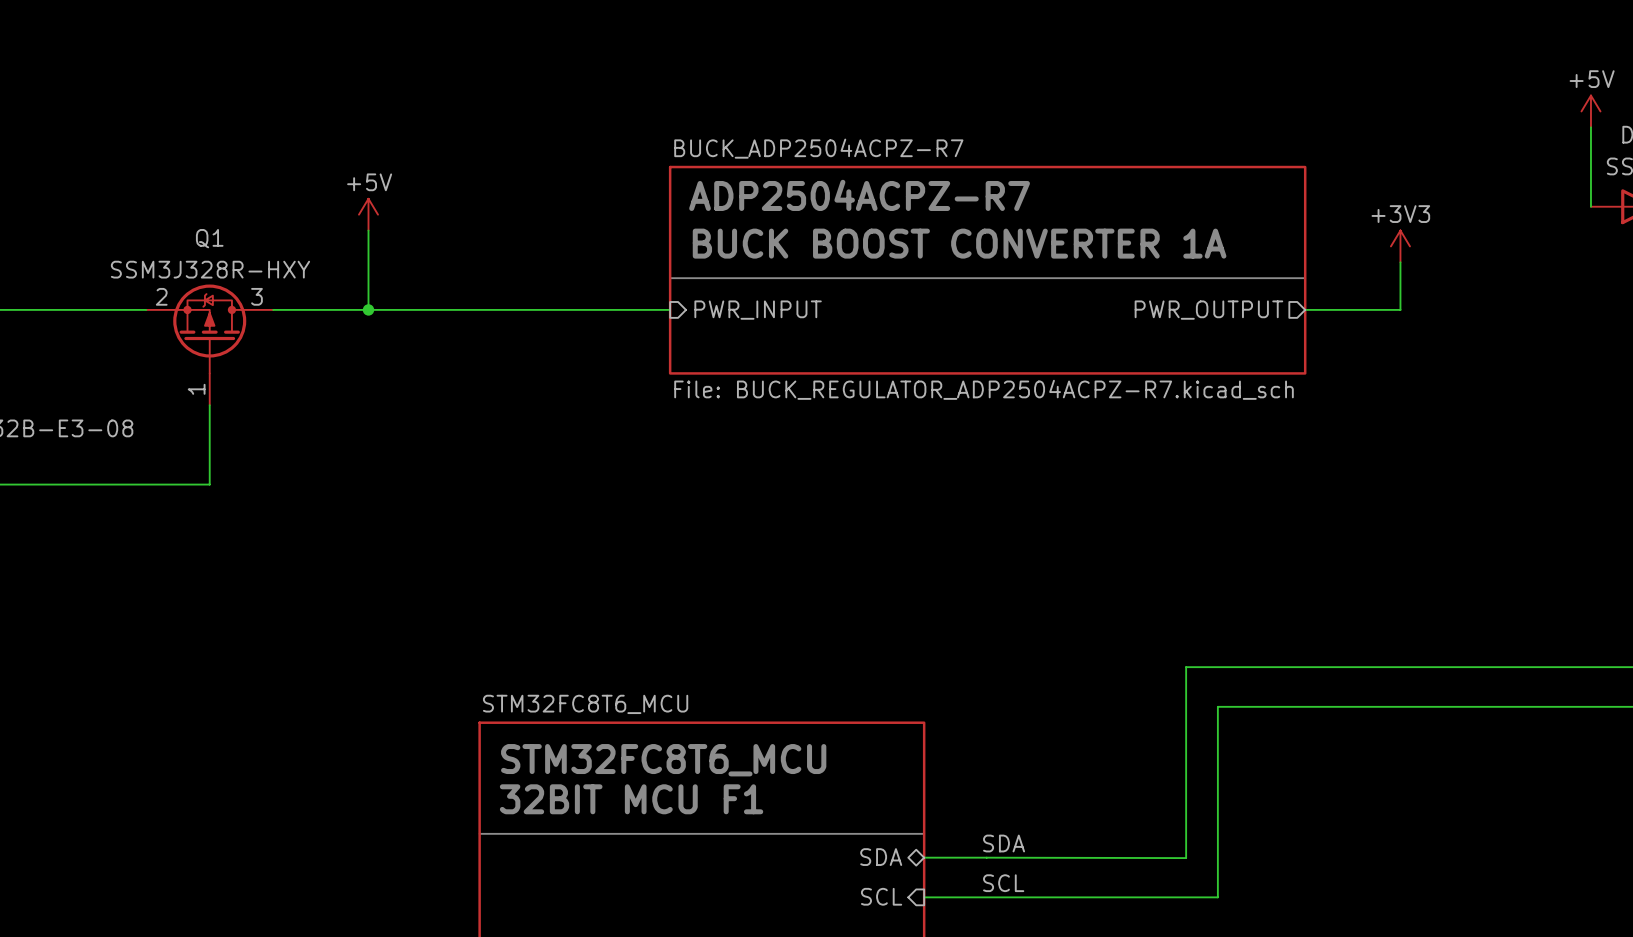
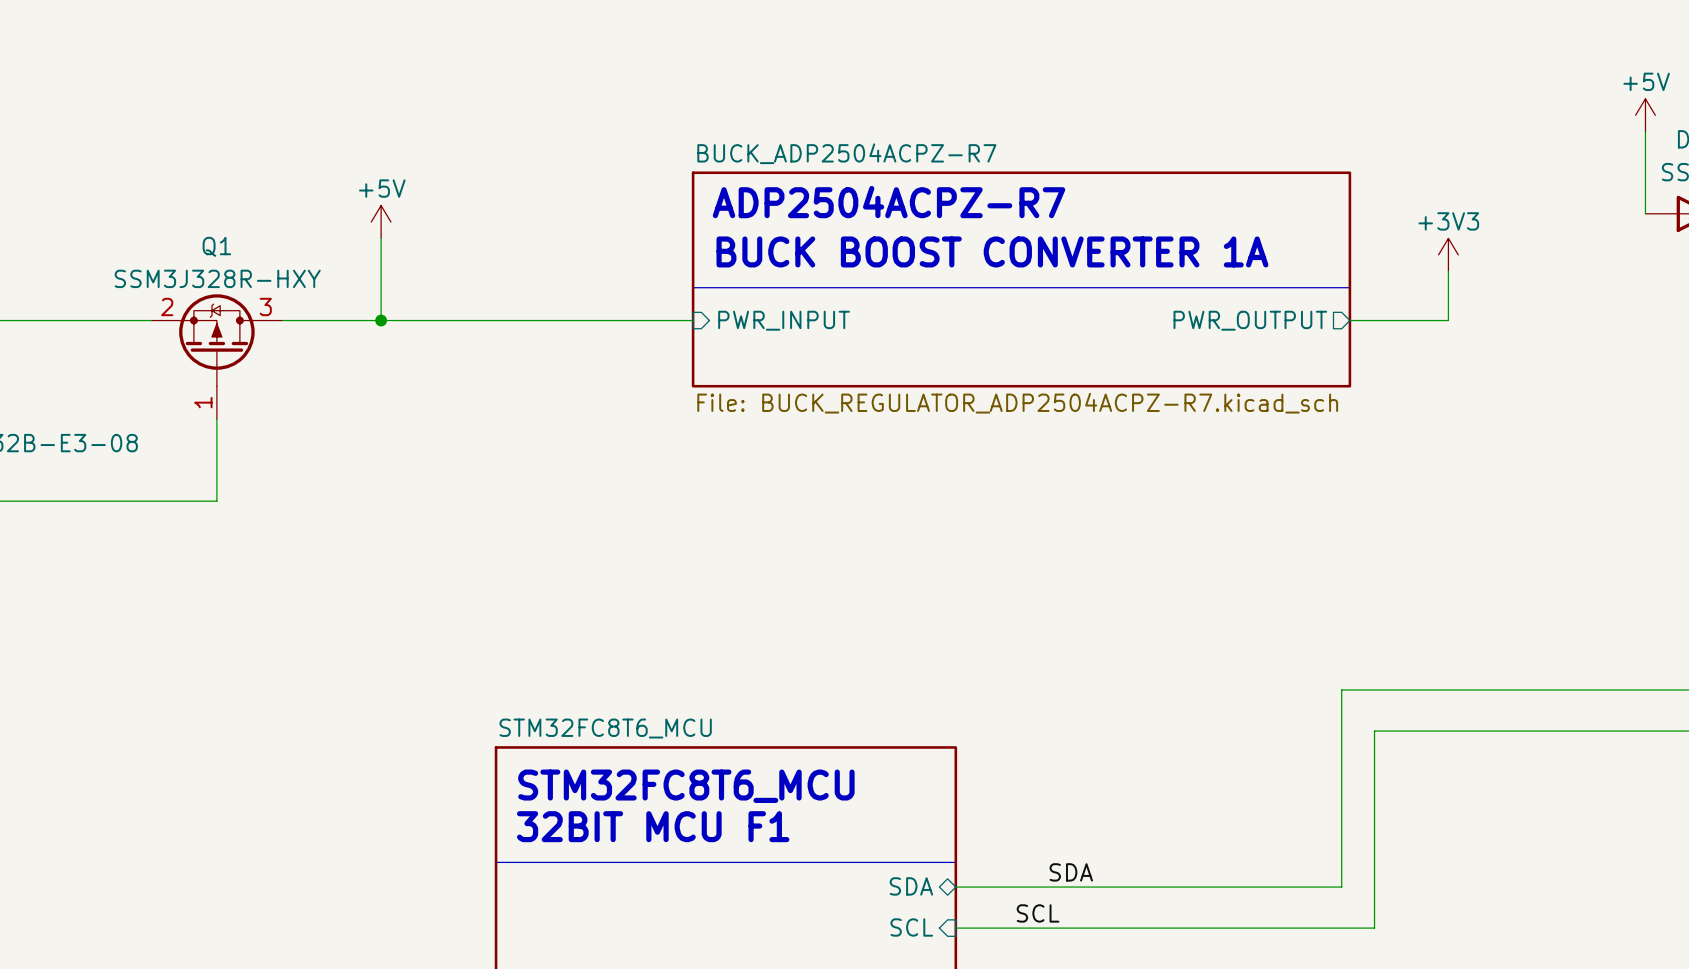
wire: (1297, 667) (1186, 667) (1186, 858) (986, 857) -> (1341, 689) (1341, 887) (1020, 887)
wire: (1329, 706) (1217, 706) (1217, 897) -> (1374, 731) (1374, 928) (1259, 928)
label position: SDA (1004, 843) -> SDA (1071, 872)

